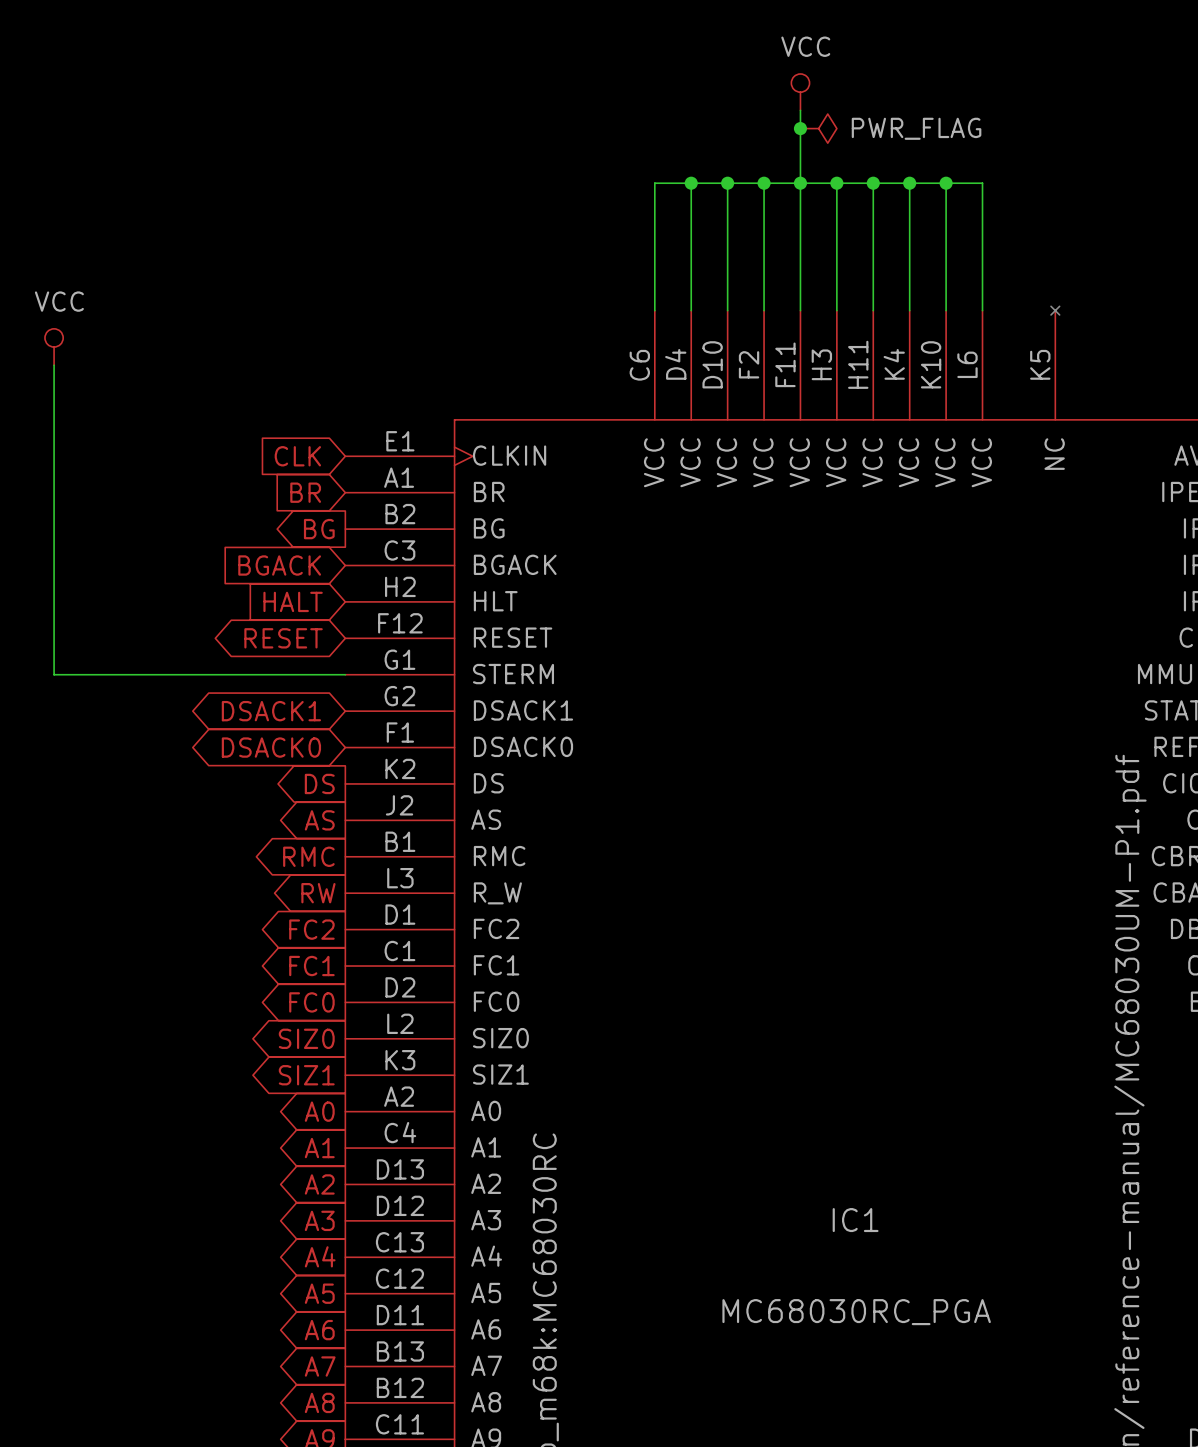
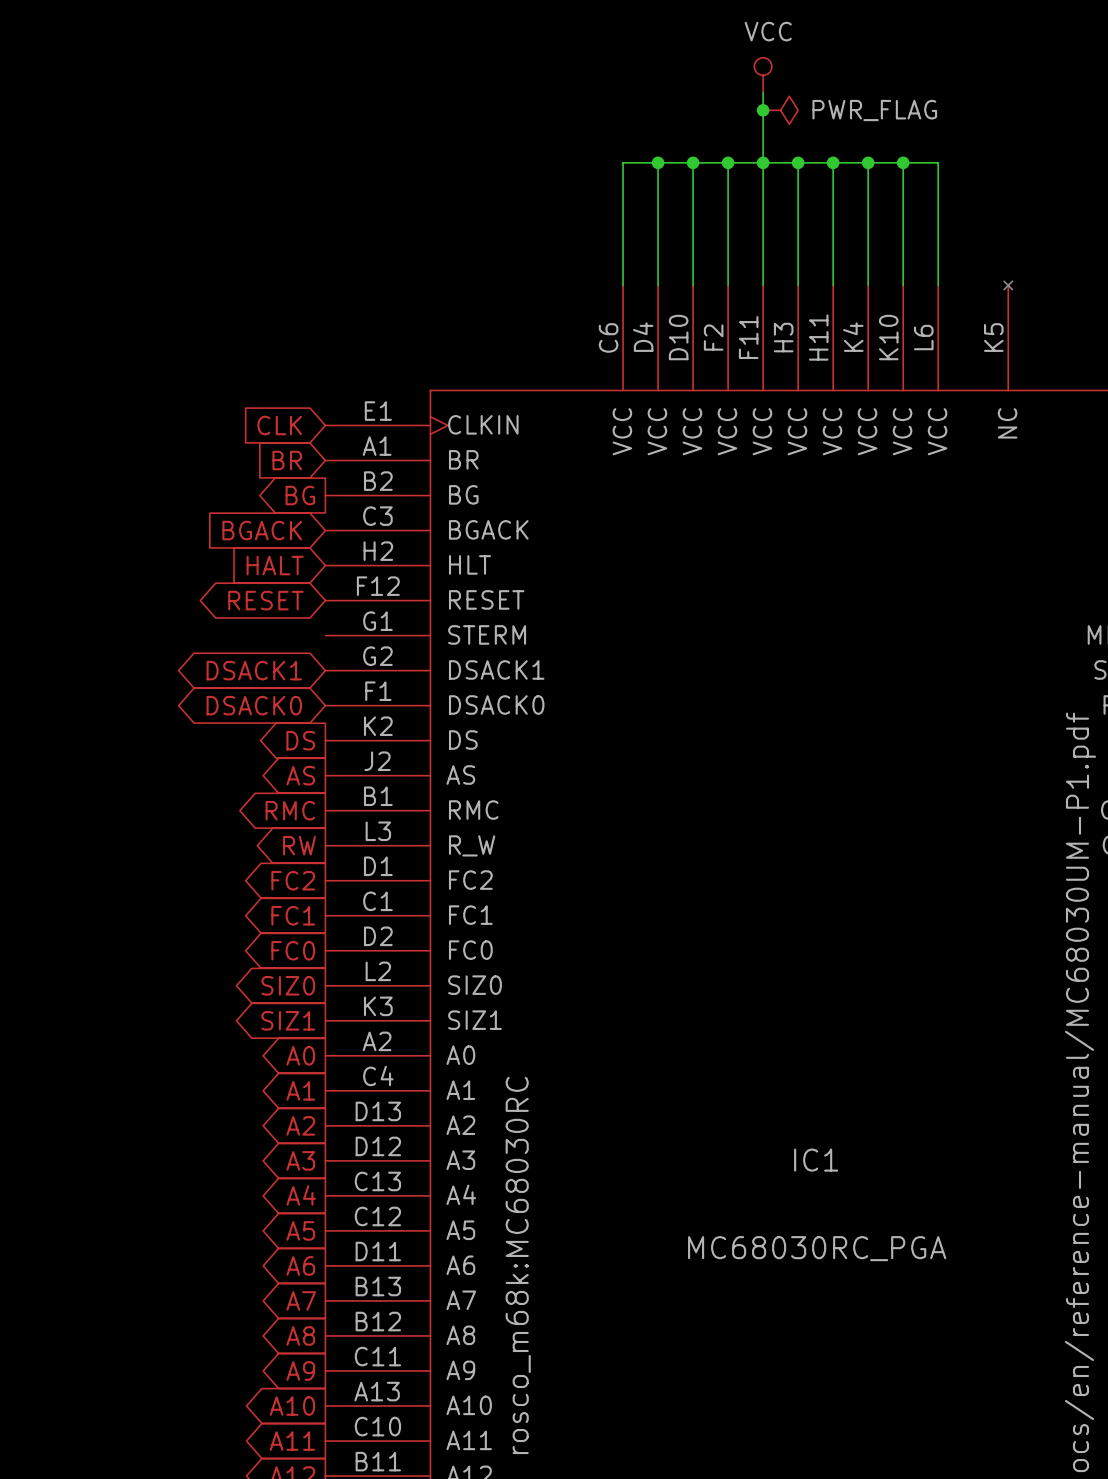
power symbol: VCC (54, 347) -> none
wire: (54, 365) (54, 674) (345, 674) -> none

